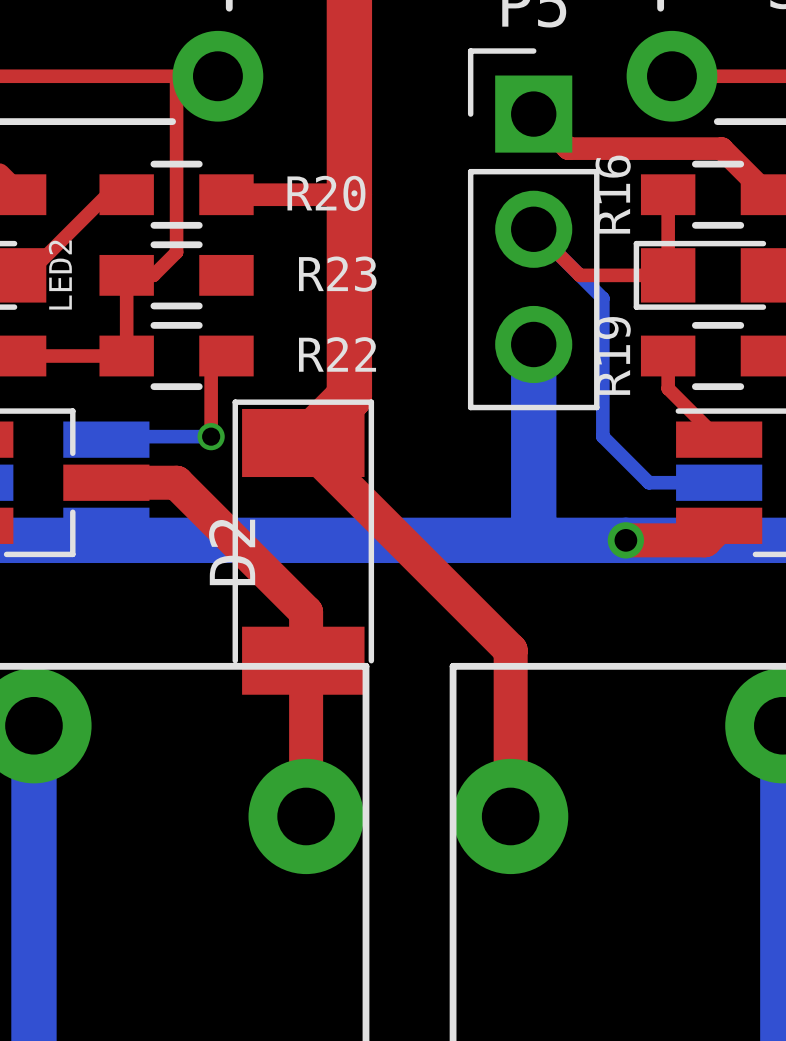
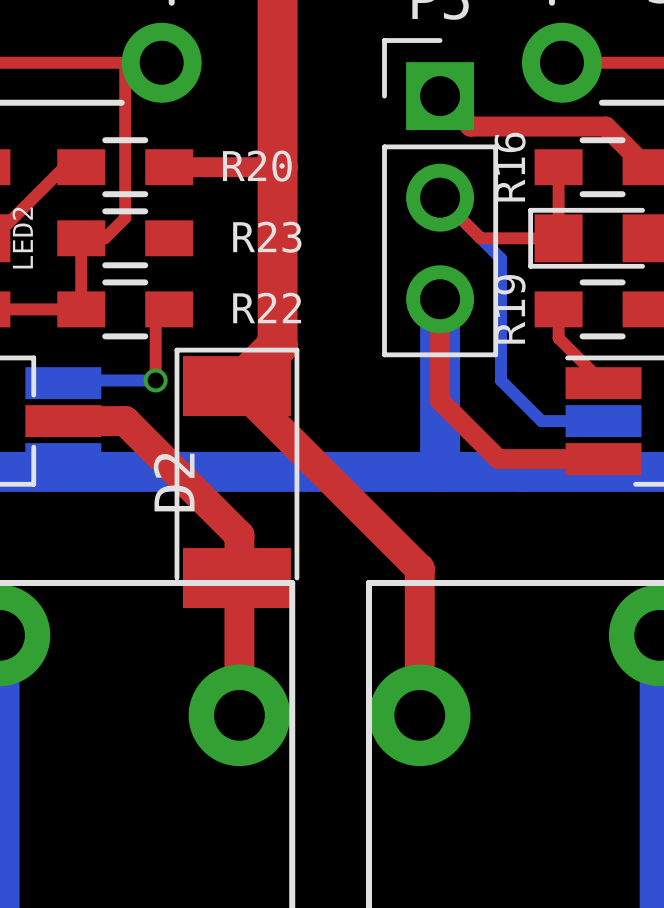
top track: (719, 525) (704, 540) (625, 540) -> (603, 459) (498, 459) (440, 400) (440, 299)
via: (625, 540) -> none

